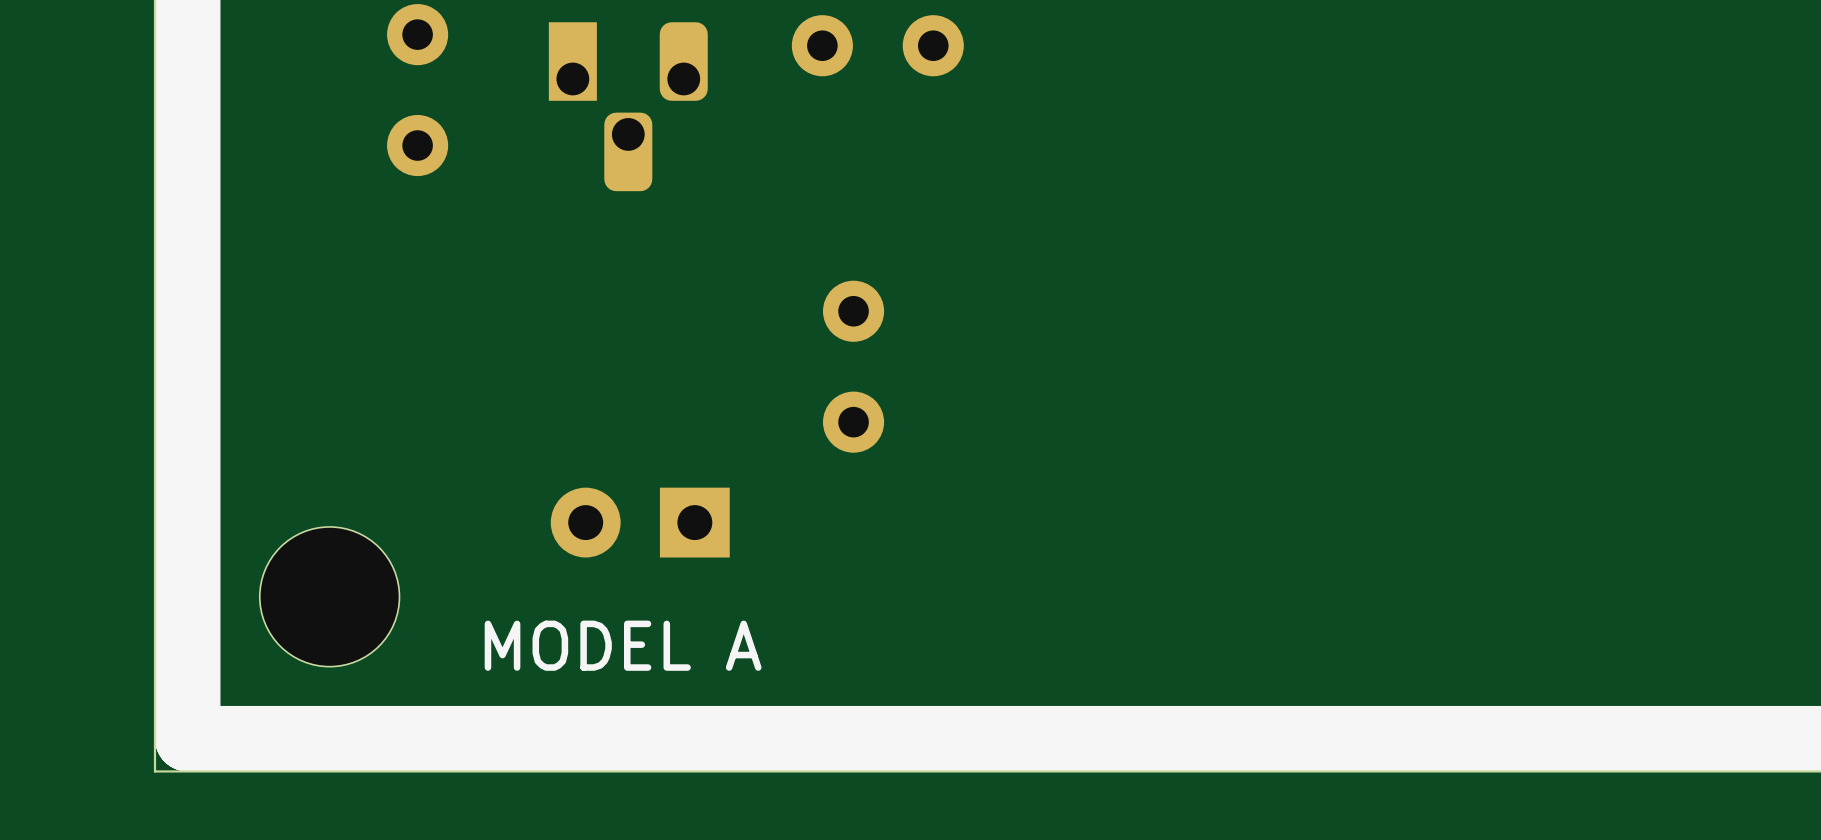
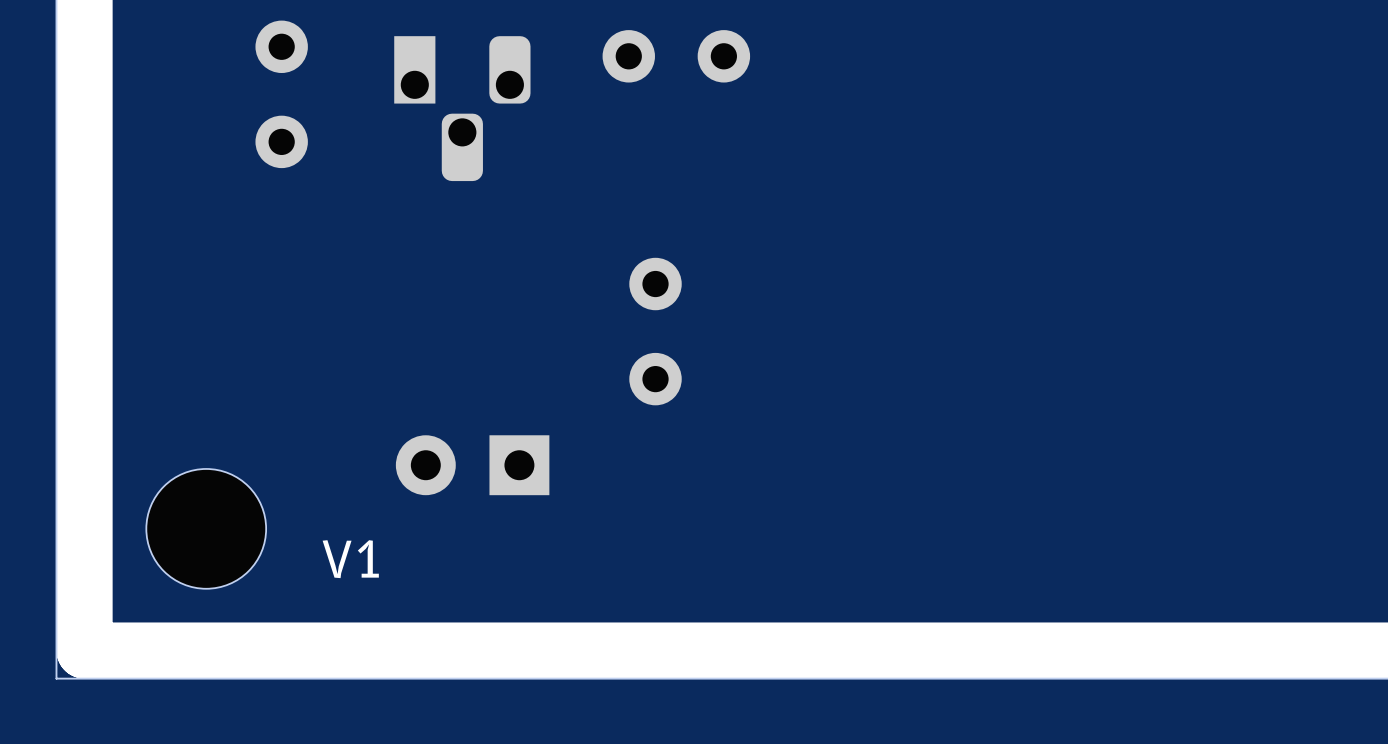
text: none -> V1 (350, 559)
text: MODEL A (623, 645) -> none

